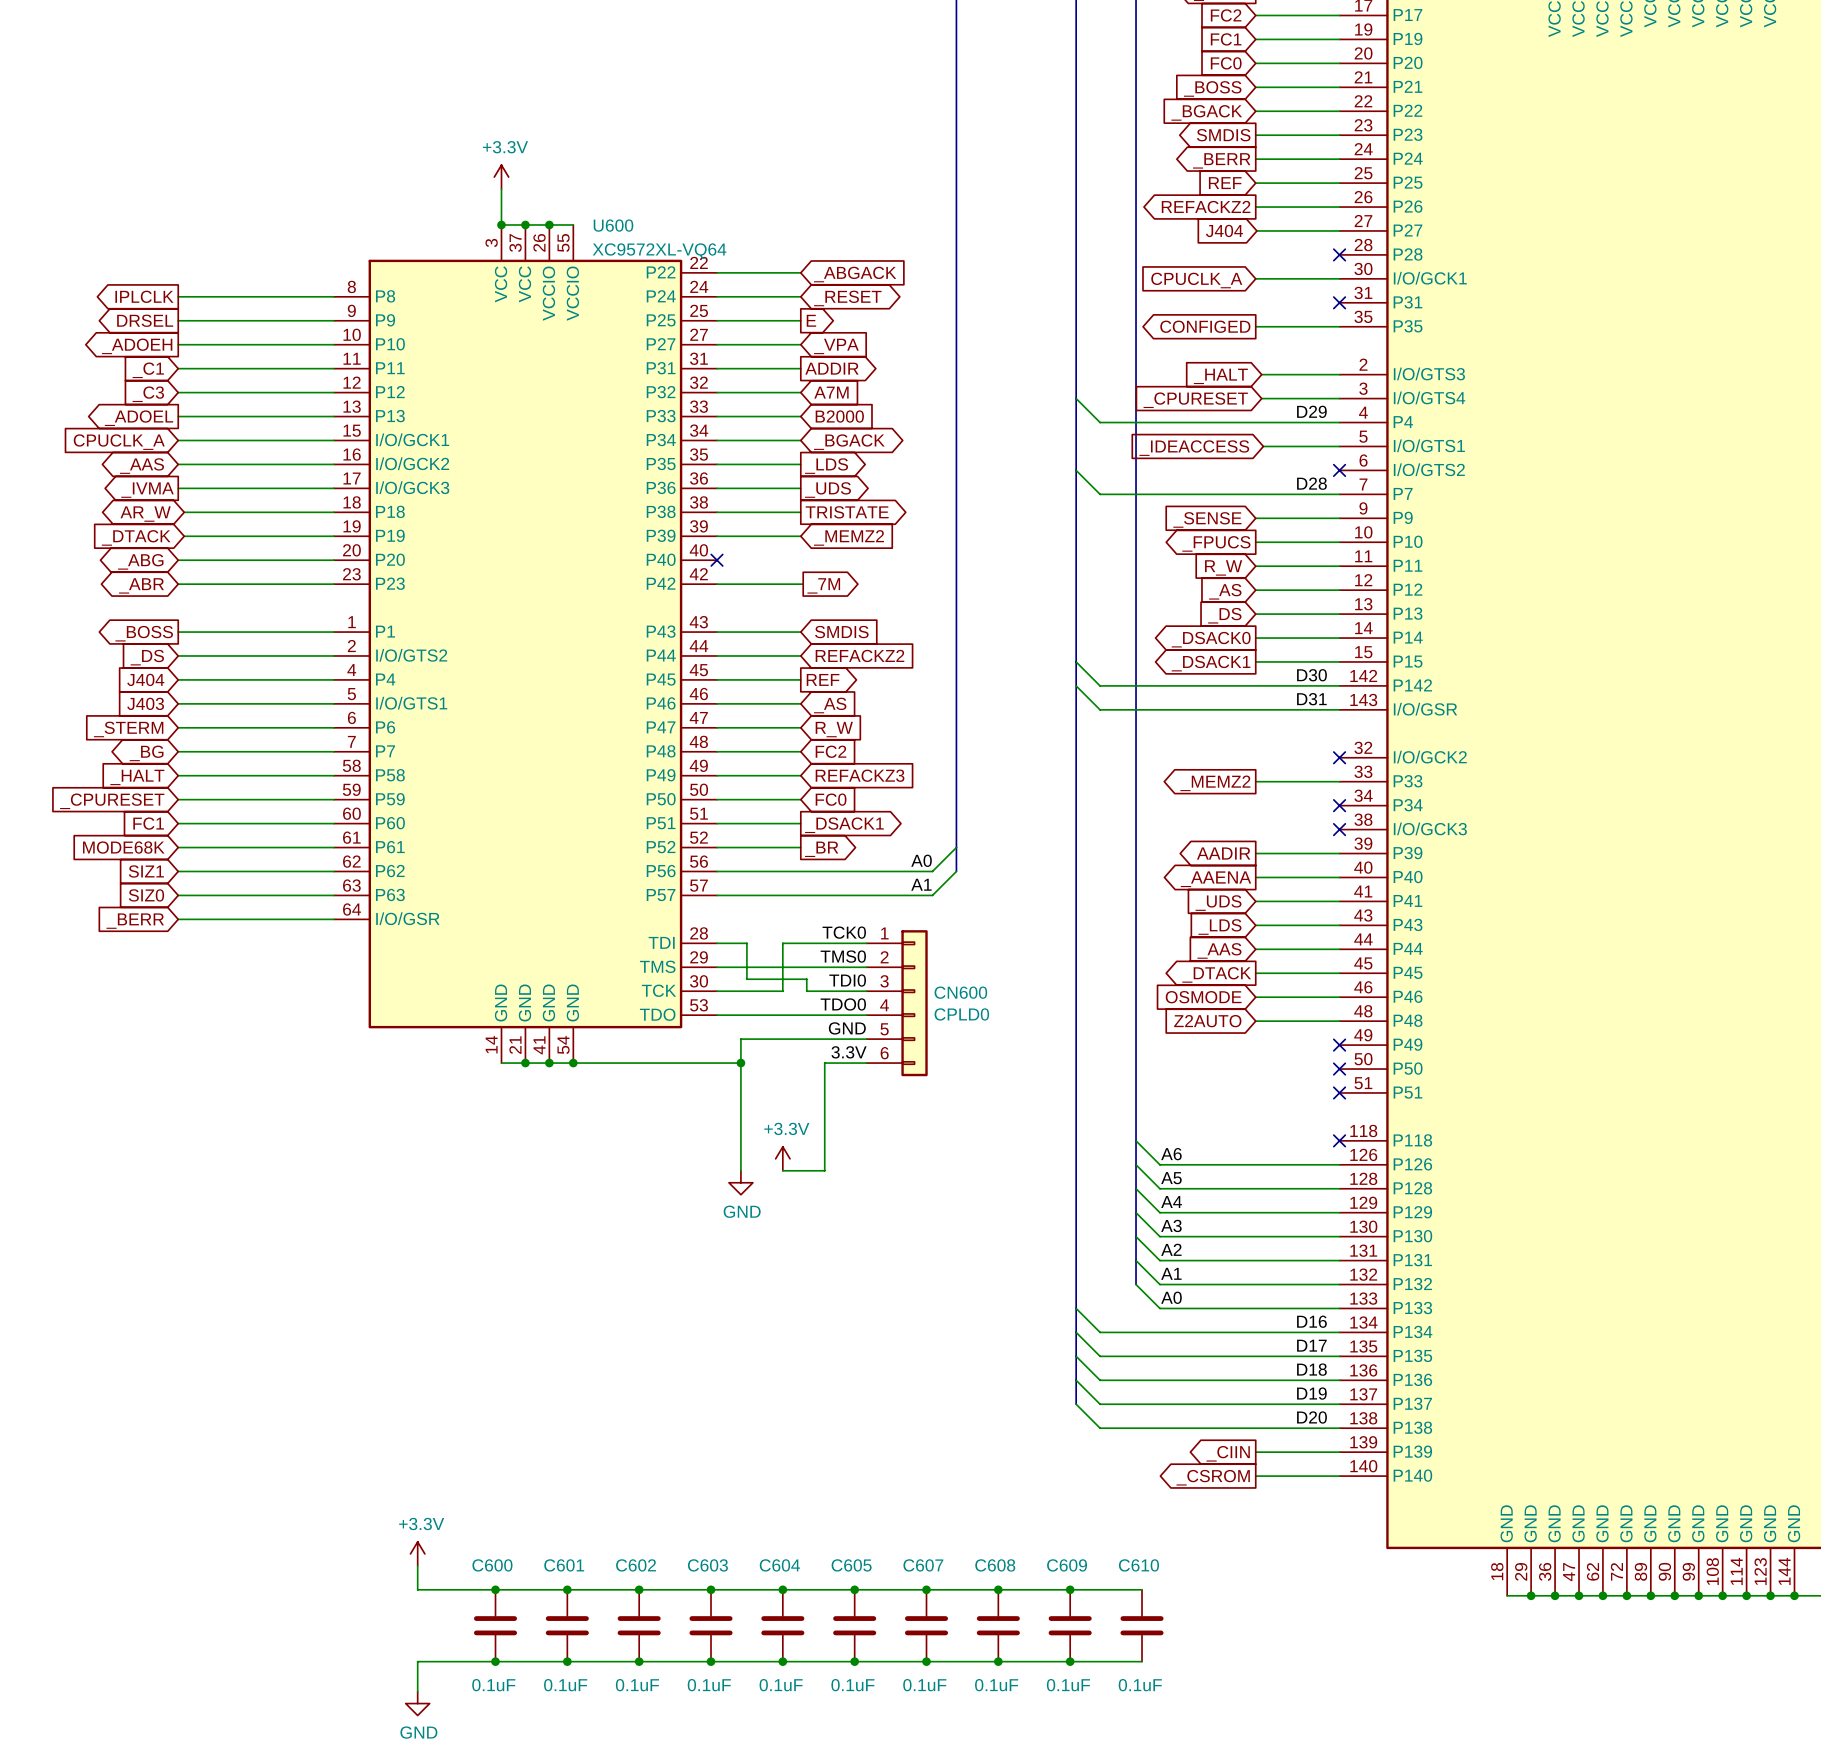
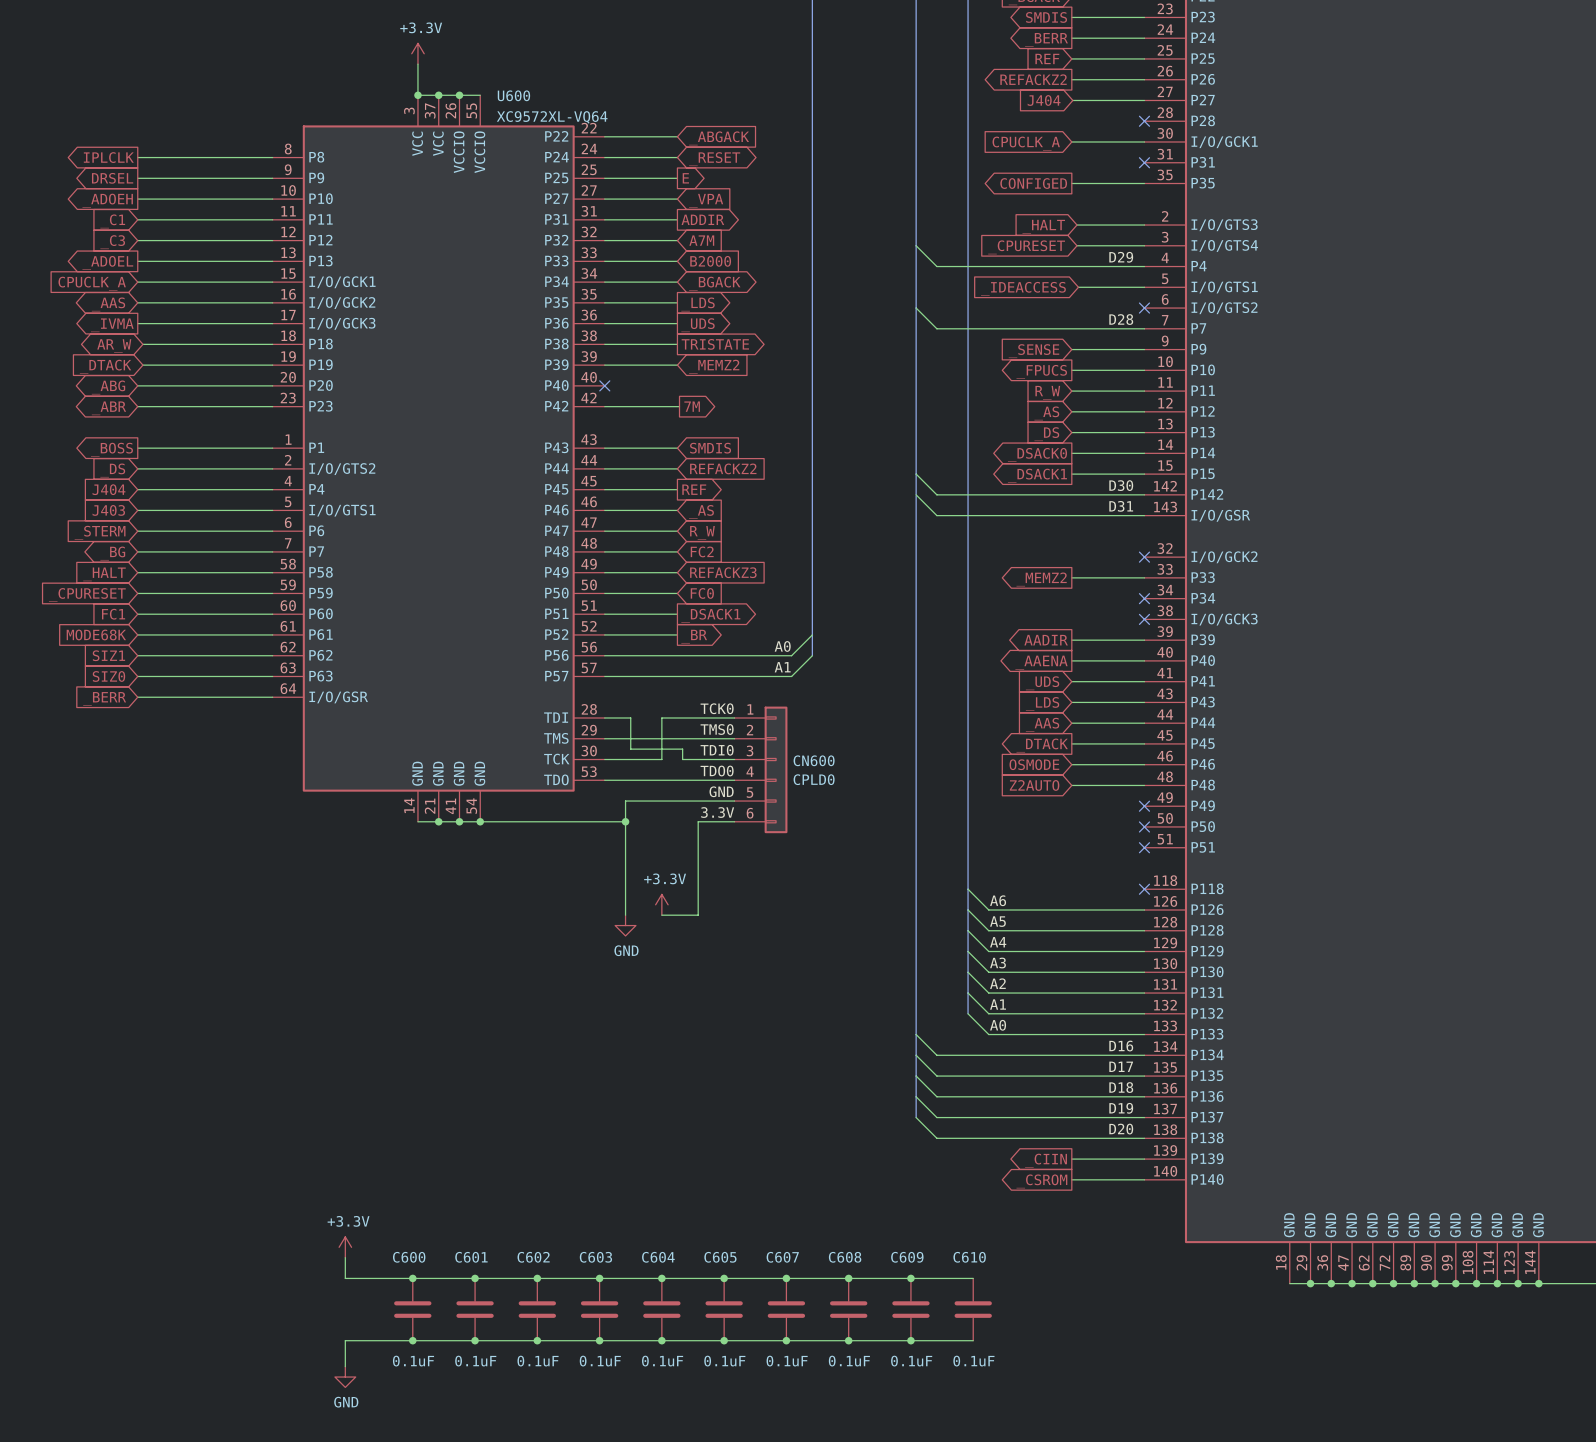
global label: _7M (823, 585) -> 7M (692, 406)

